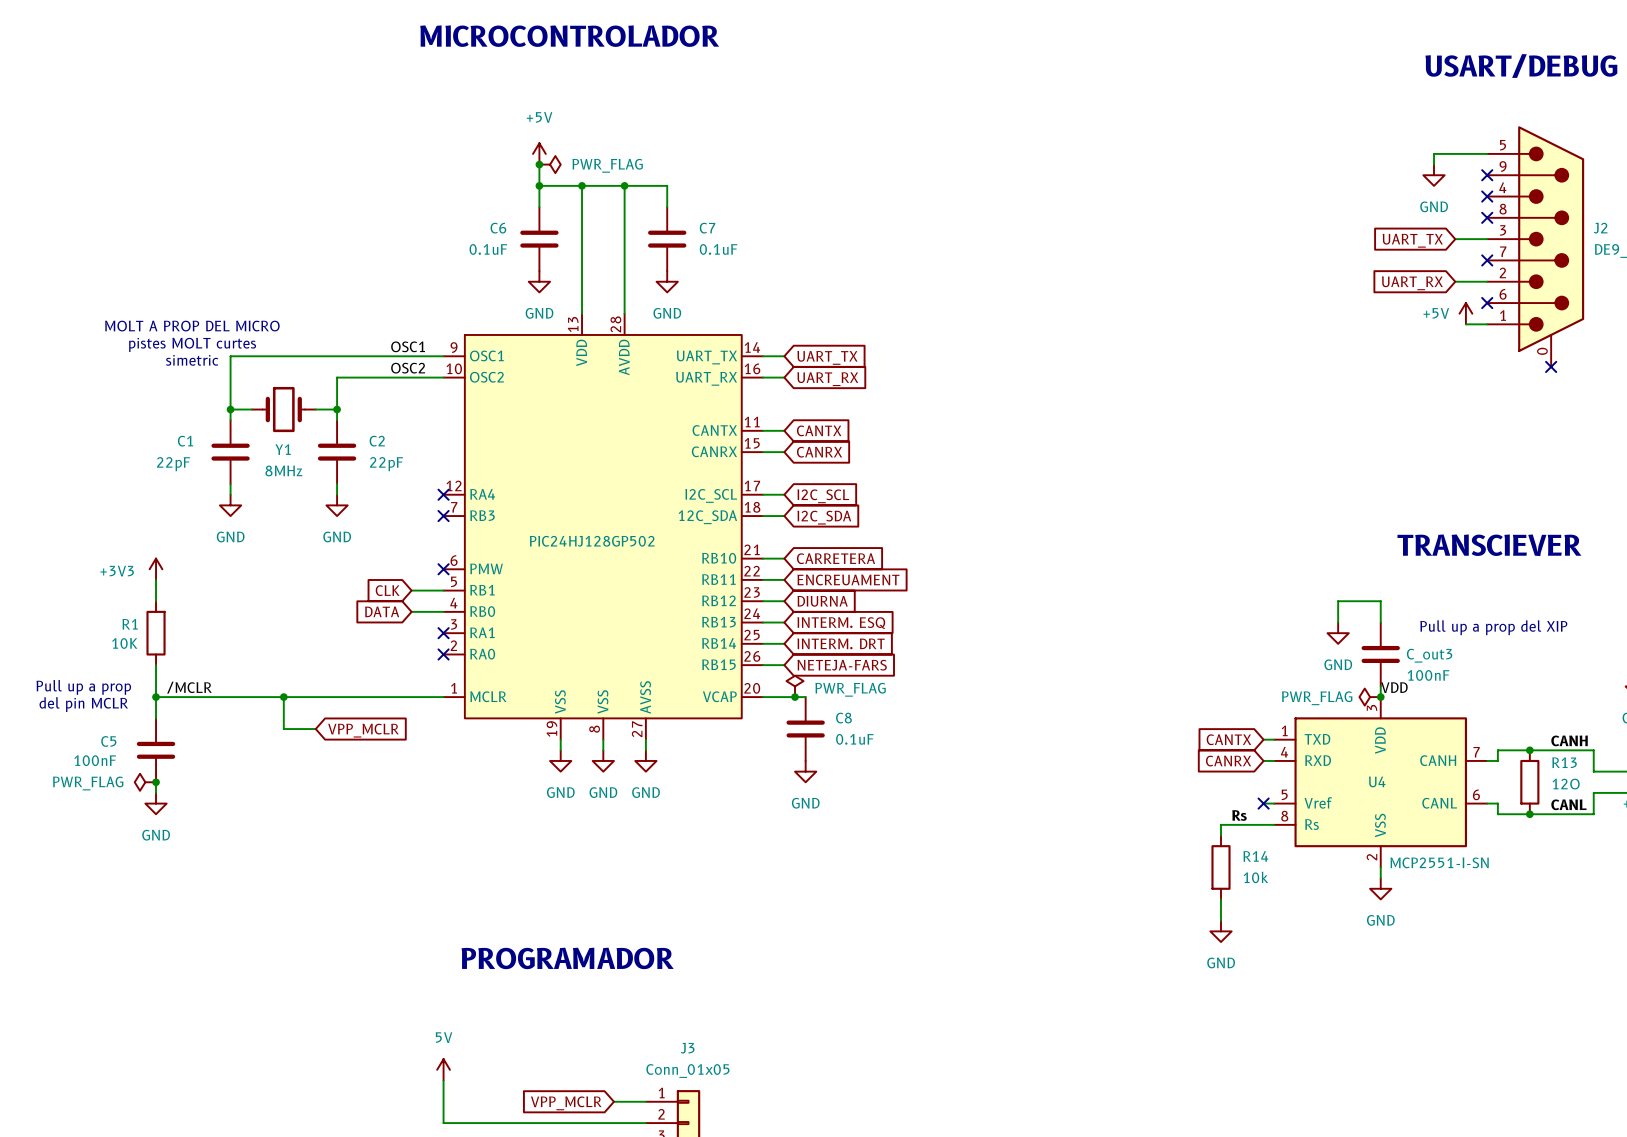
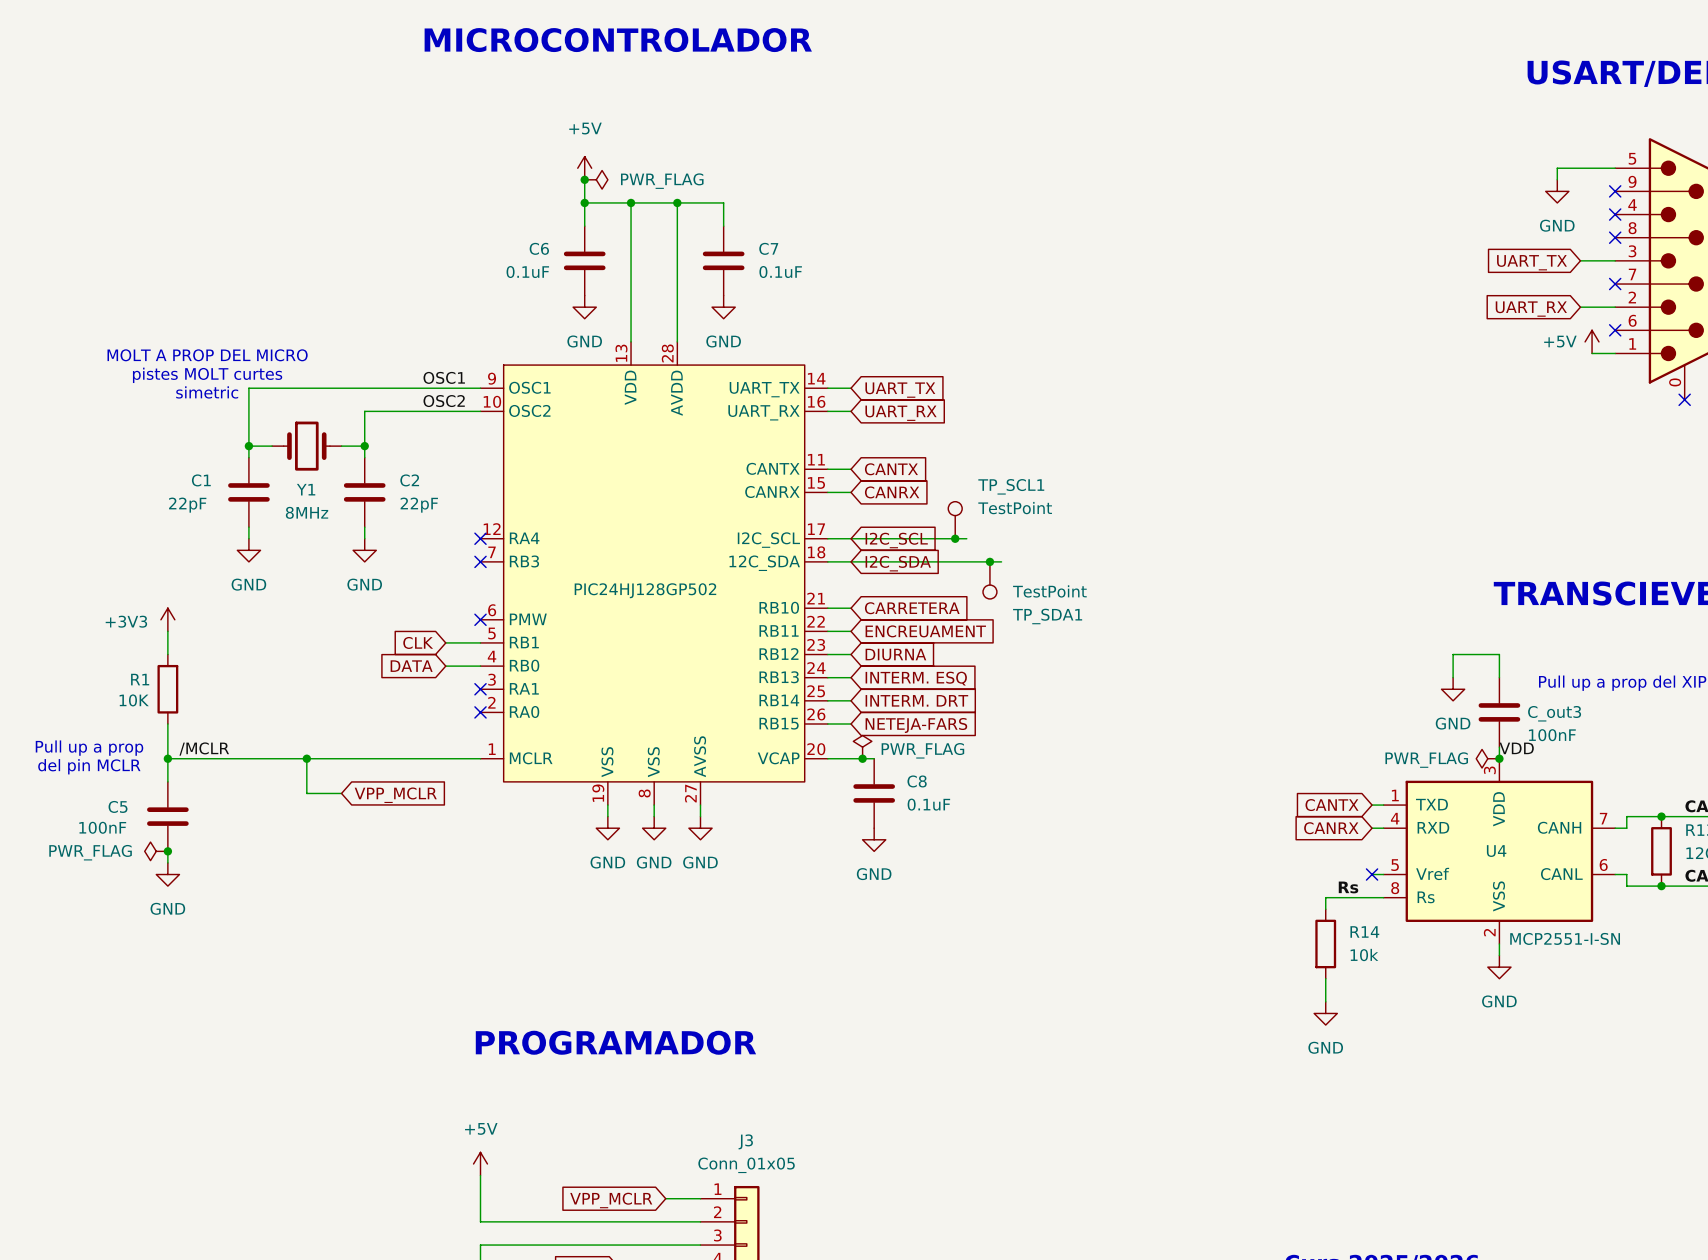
TP_SCL1: none -> TestPoint (955, 520)
wire: none -> (851, 538) (966, 538)
junction: none -> (955, 538)
wire: none -> (851, 561) (1001, 561)
junction: none -> (989, 561)
TP_SDA1: none -> TestPoint (989, 580)
power symbol: 5V (443, 1069) -> +5V (480, 1163)

